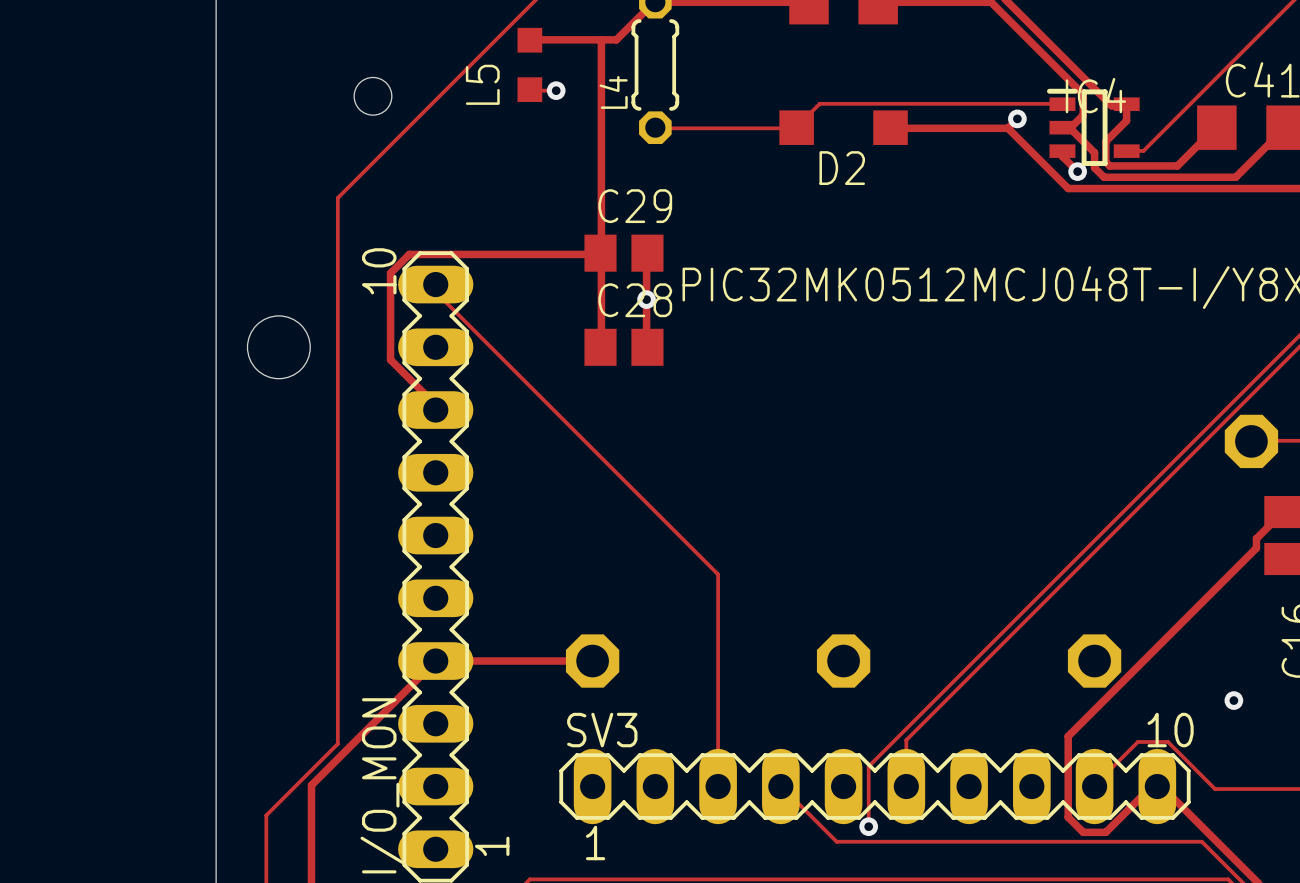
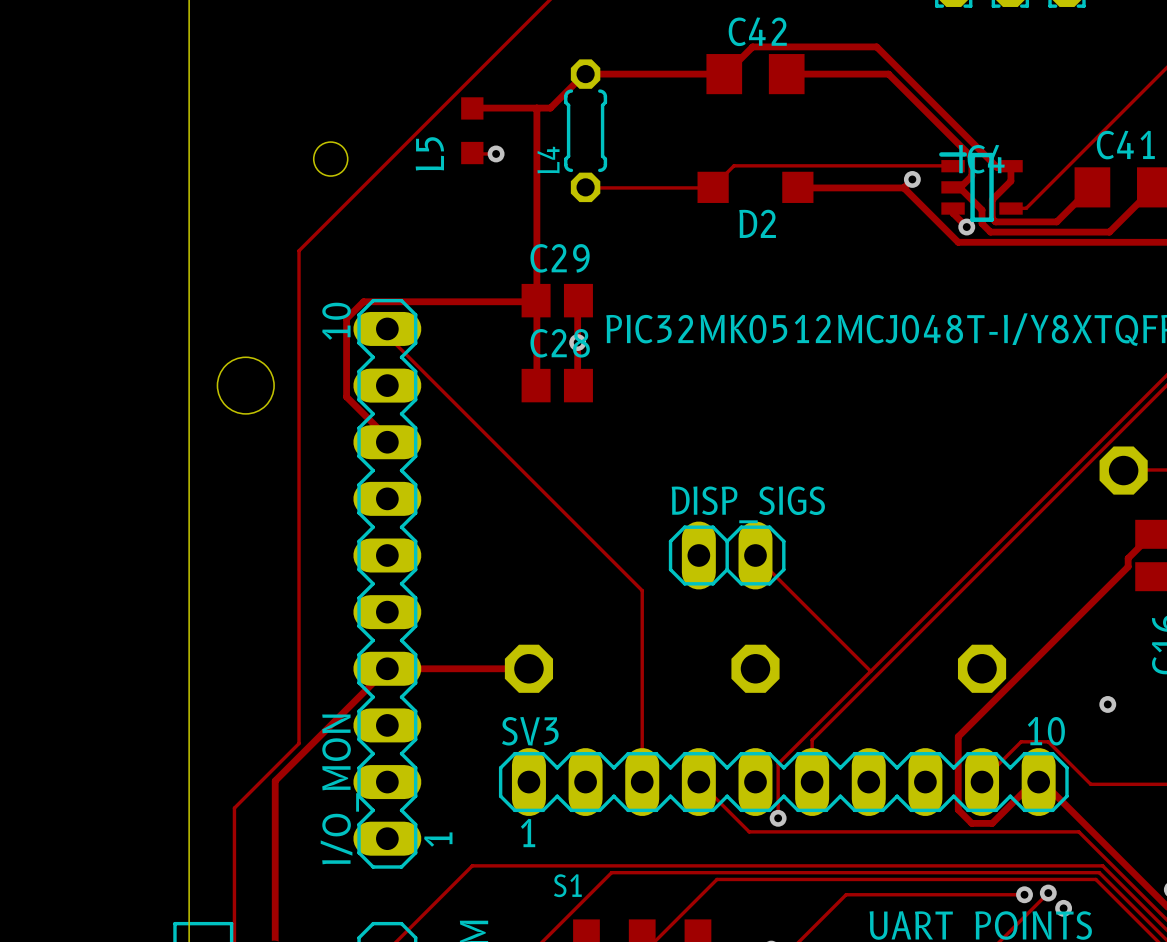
DISP_SIGS: none -> (727, 555)
track: none -> (755, 555) (870, 671)

